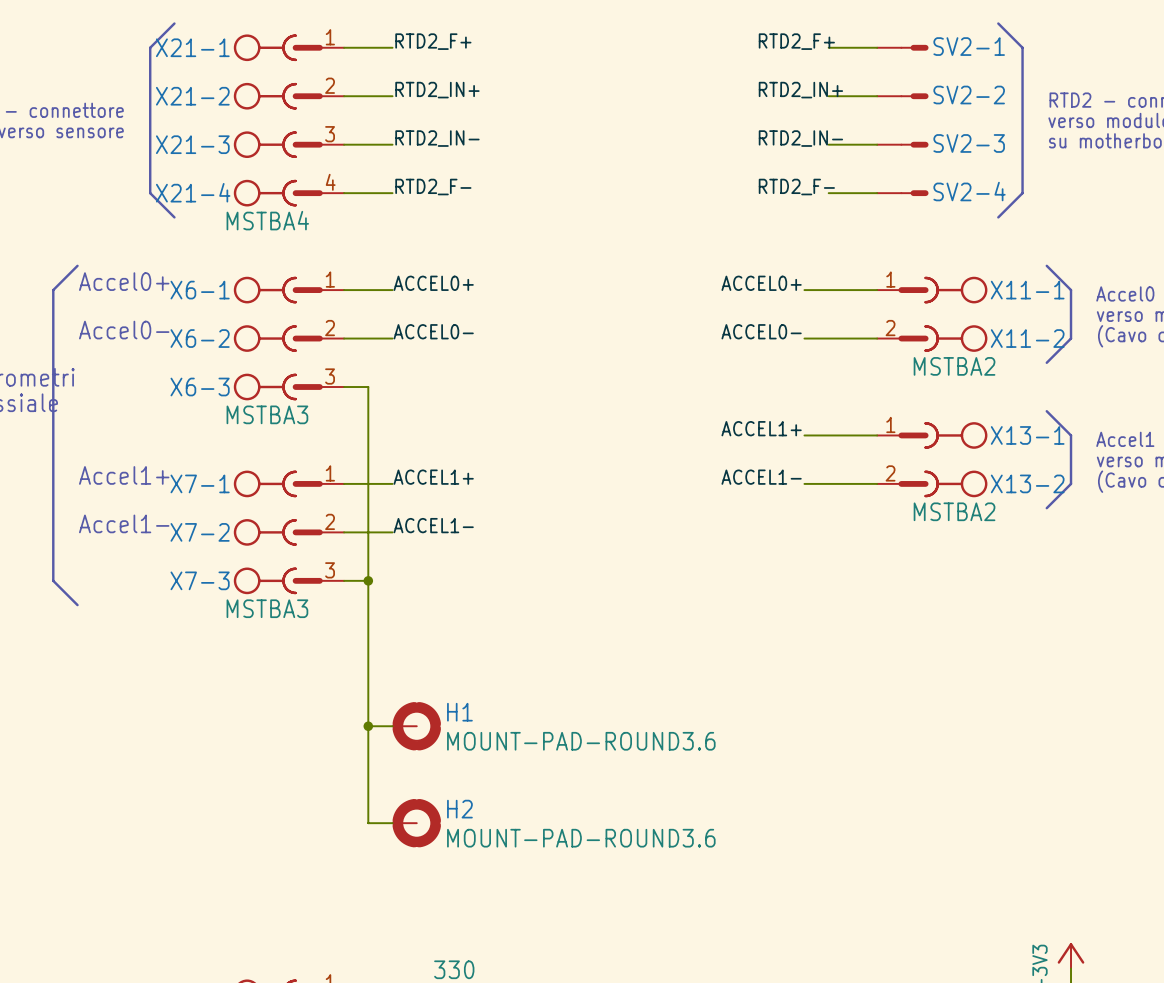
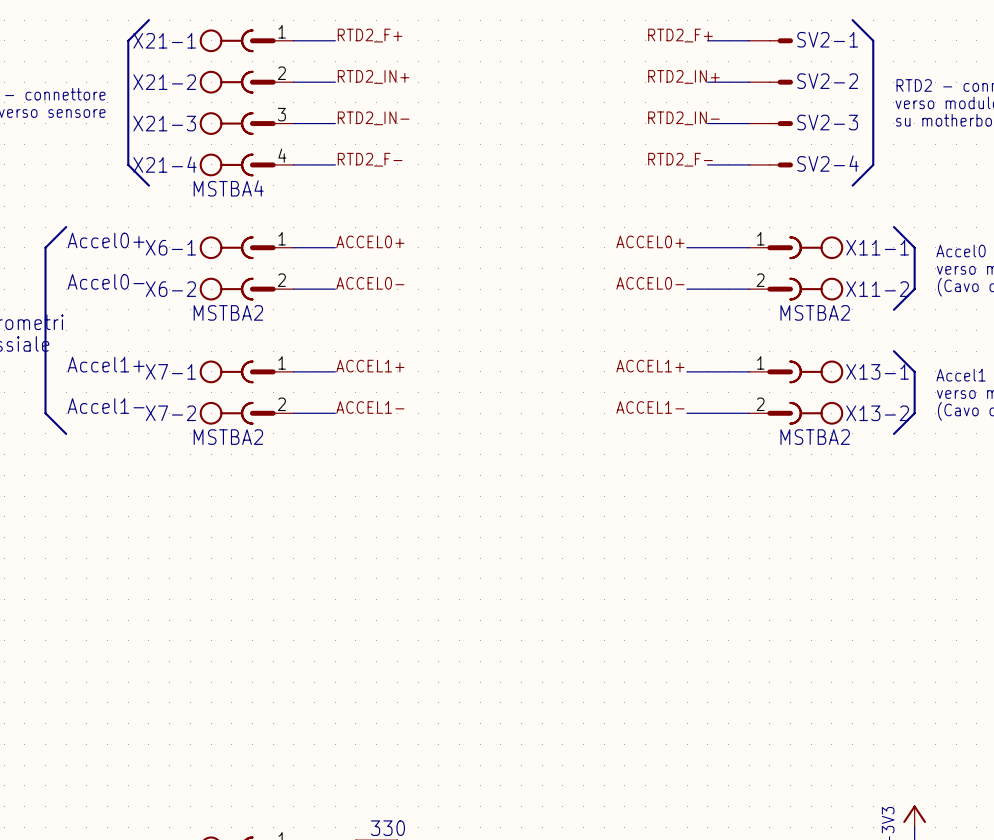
X6-2 value: none -> MSTBA2 (228, 312)
X6-3: MSTBA3 (288, 387) -> none
wire: (344, 387) (368, 387) (368, 823) (392, 823) -> none
text: none -> Accel1+ (106, 364)
label: none -> ACCEL1+ (370, 366)
text: Accel1+ (124, 475) -> Accel1- (106, 406)
label: ACCEL1+ (433, 477) -> ACCEL1- (370, 407)
line: (53, 483) (53, 580) (77, 605) -> (45, 413) (66, 433)
X7-1 position: (288, 483) -> (246, 371)
X7-2 value: none -> MSTBA2 (228, 437)
text: Accel1- (124, 523) -> none
label: ACCEL1- (433, 525) -> none
X7-2 position: (288, 532) -> (246, 413)
wire: (344, 532) (392, 532) -> (293, 371) (335, 371)
X7-3: MSTBA3 (288, 580) -> none
wire: (344, 580) (368, 580) -> none
junction: (368, 580) -> none
wire: (368, 726) (392, 726) -> none
junction: (368, 726) -> none
H1: MOUNT-PAD-ROUND3.6 (416, 726) -> none
H2: MOUNT-PAD-ROUND3.6 (416, 823) -> none

